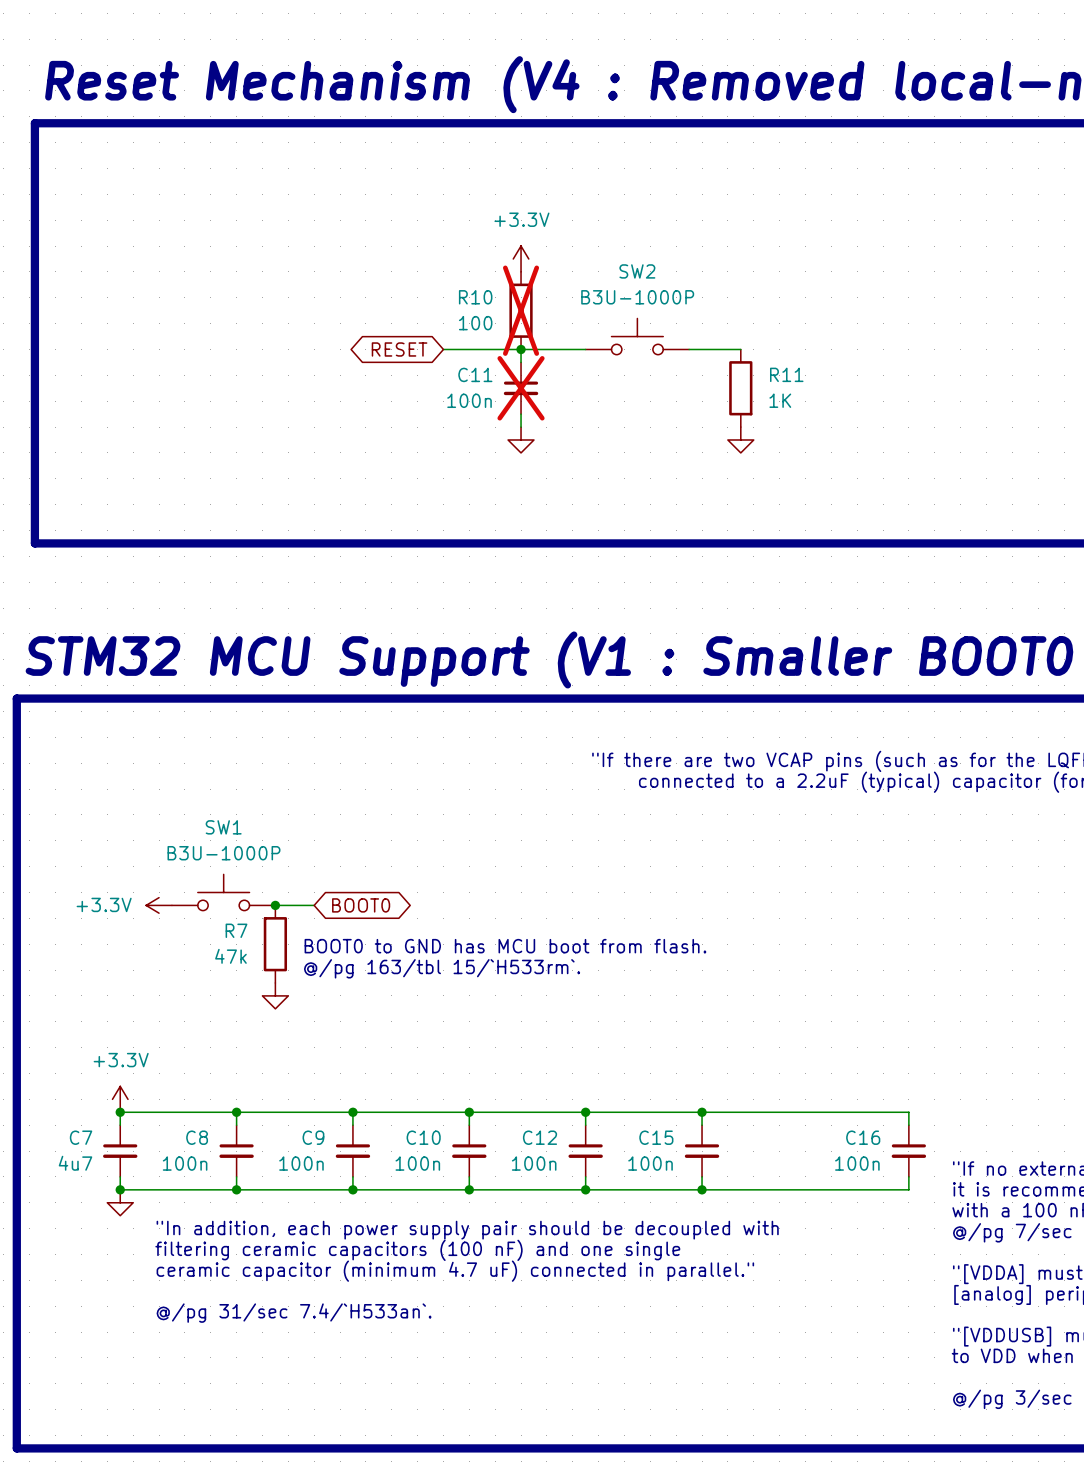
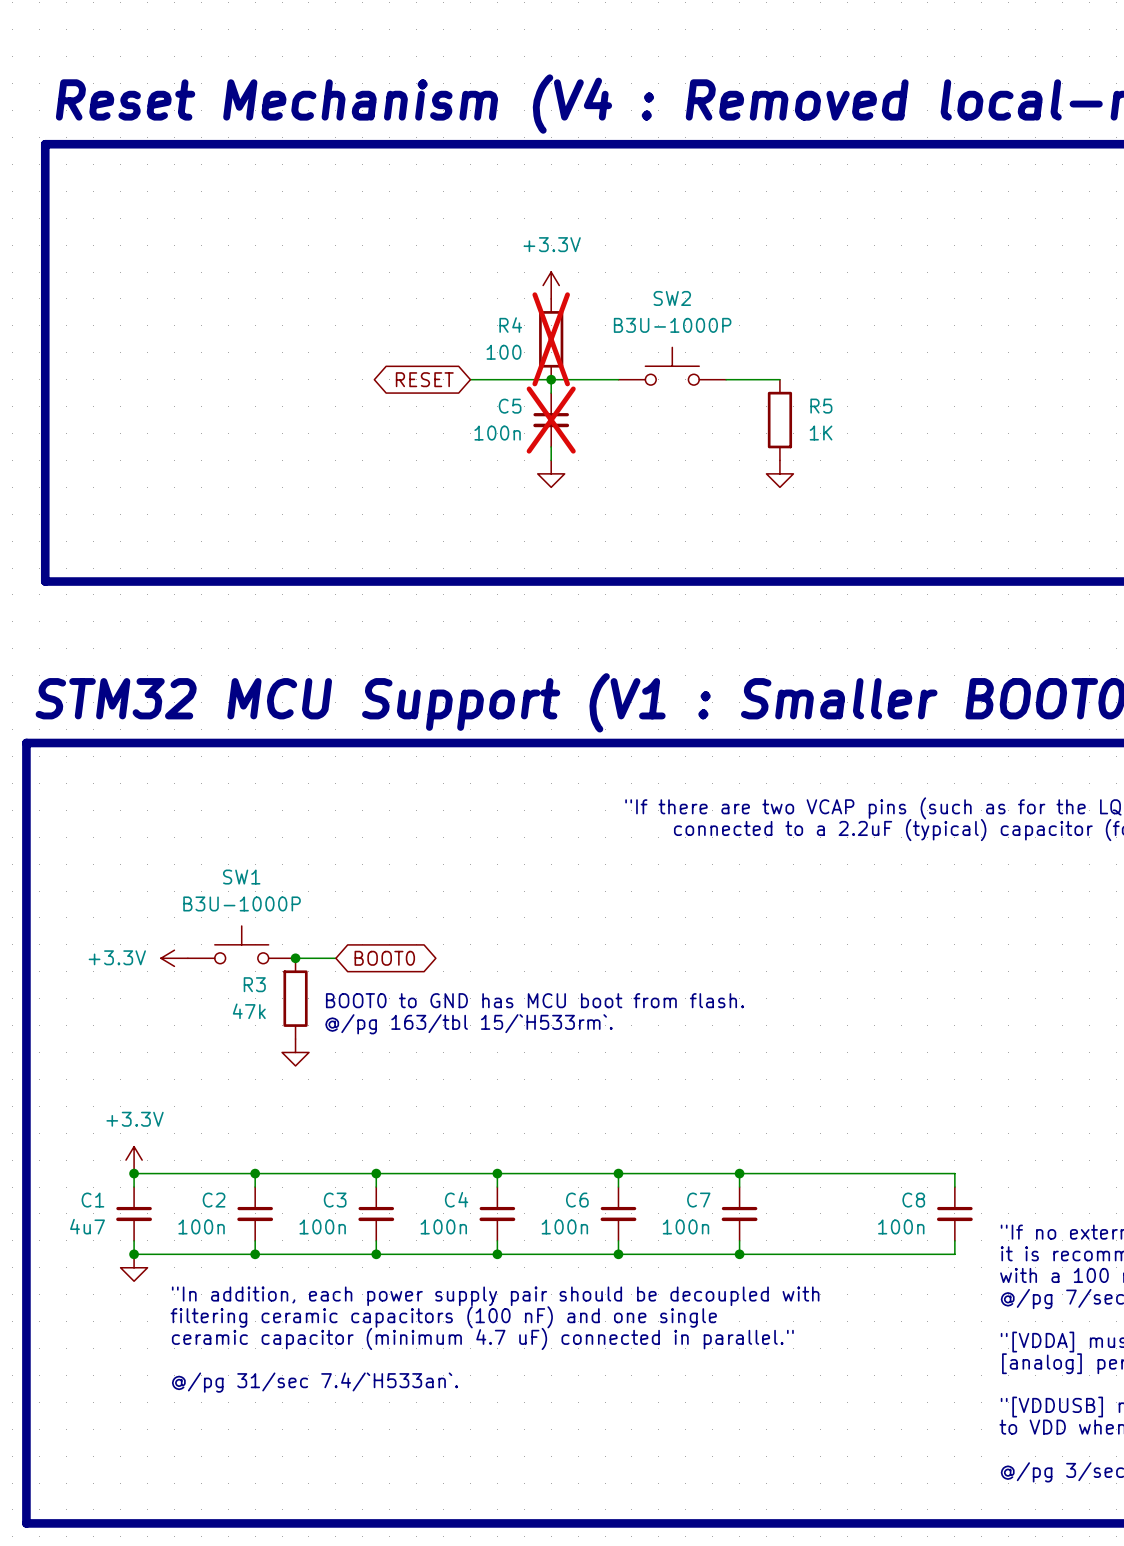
R10 name: R10 (475, 297) -> R4 (510, 325)
C11 name: C11 (475, 374) -> C5 (510, 406)
R11 name: R11 (786, 374) -> R5 (821, 406)
R7 name: R7 (236, 930) -> R3 (254, 984)
C7 name: C7 (81, 1137) -> C1 (92, 1200)
C8 name: C8 (197, 1137) -> C2 (214, 1200)
C9 name: C9 (313, 1137) -> C3 (335, 1200)
C10 name: C10 (423, 1137) -> C4 (456, 1199)
C12 name: C12 (540, 1137) -> C6 (577, 1200)
C15 name: C15 (656, 1137) -> C7 (698, 1200)
C16 name: C16 (863, 1137) -> C8 (913, 1200)

